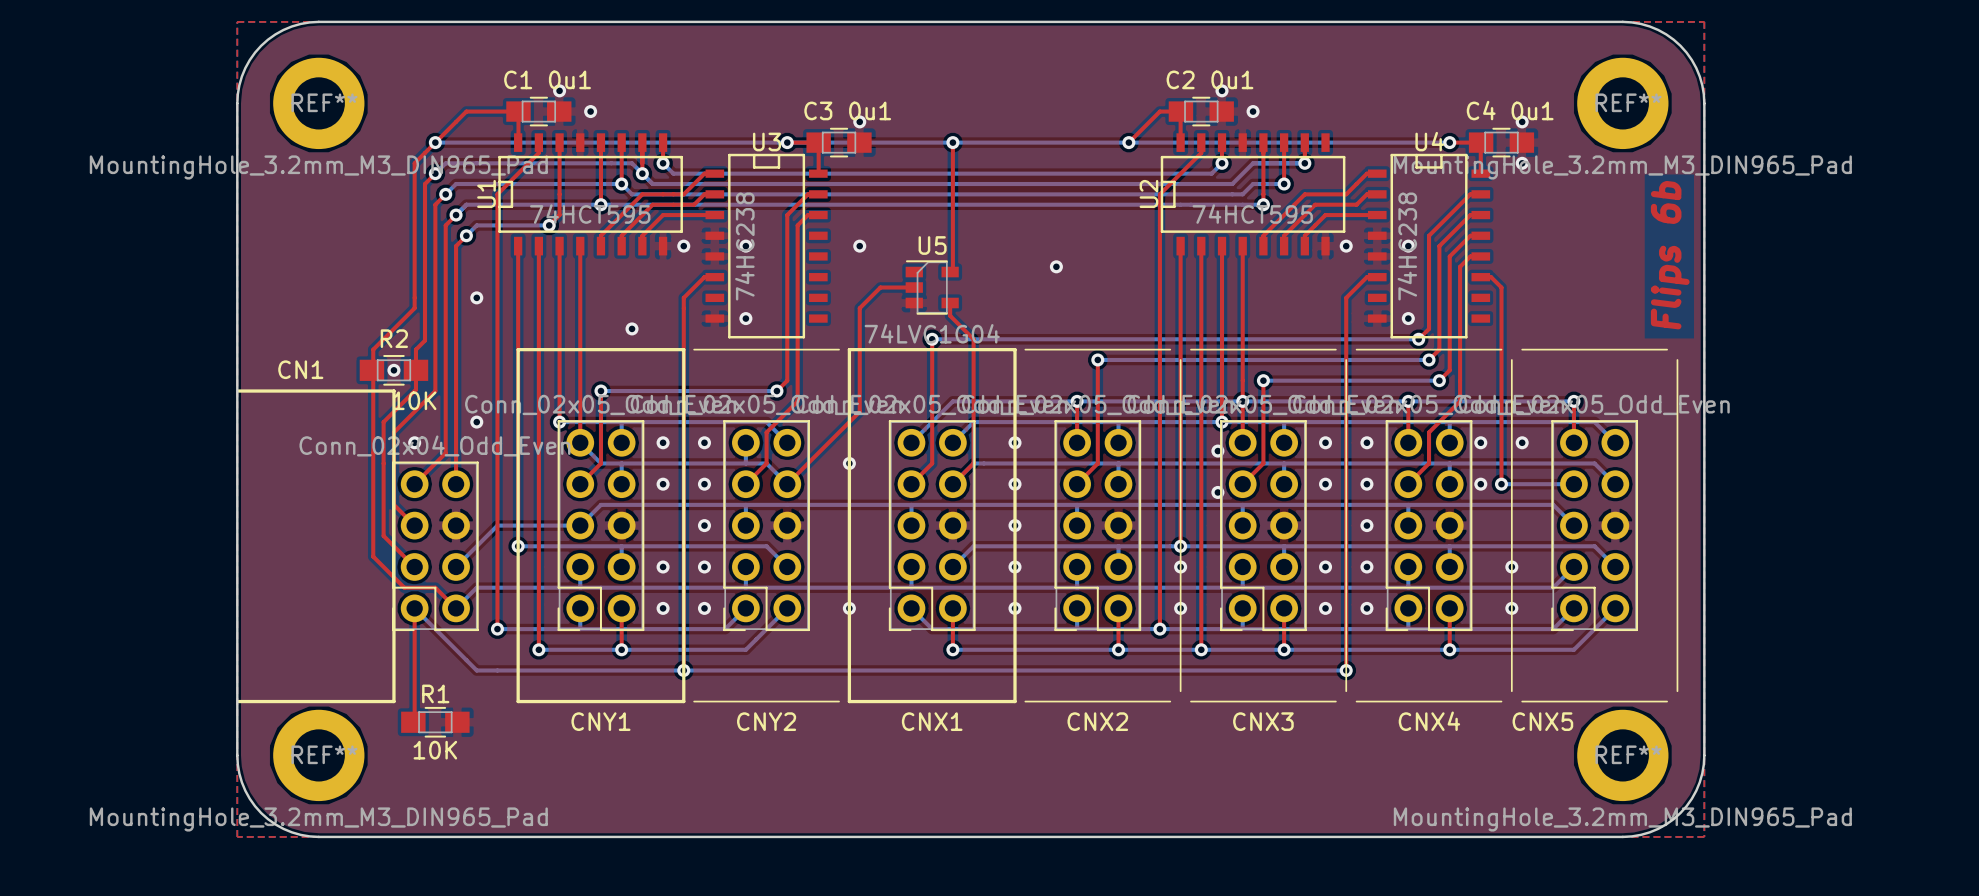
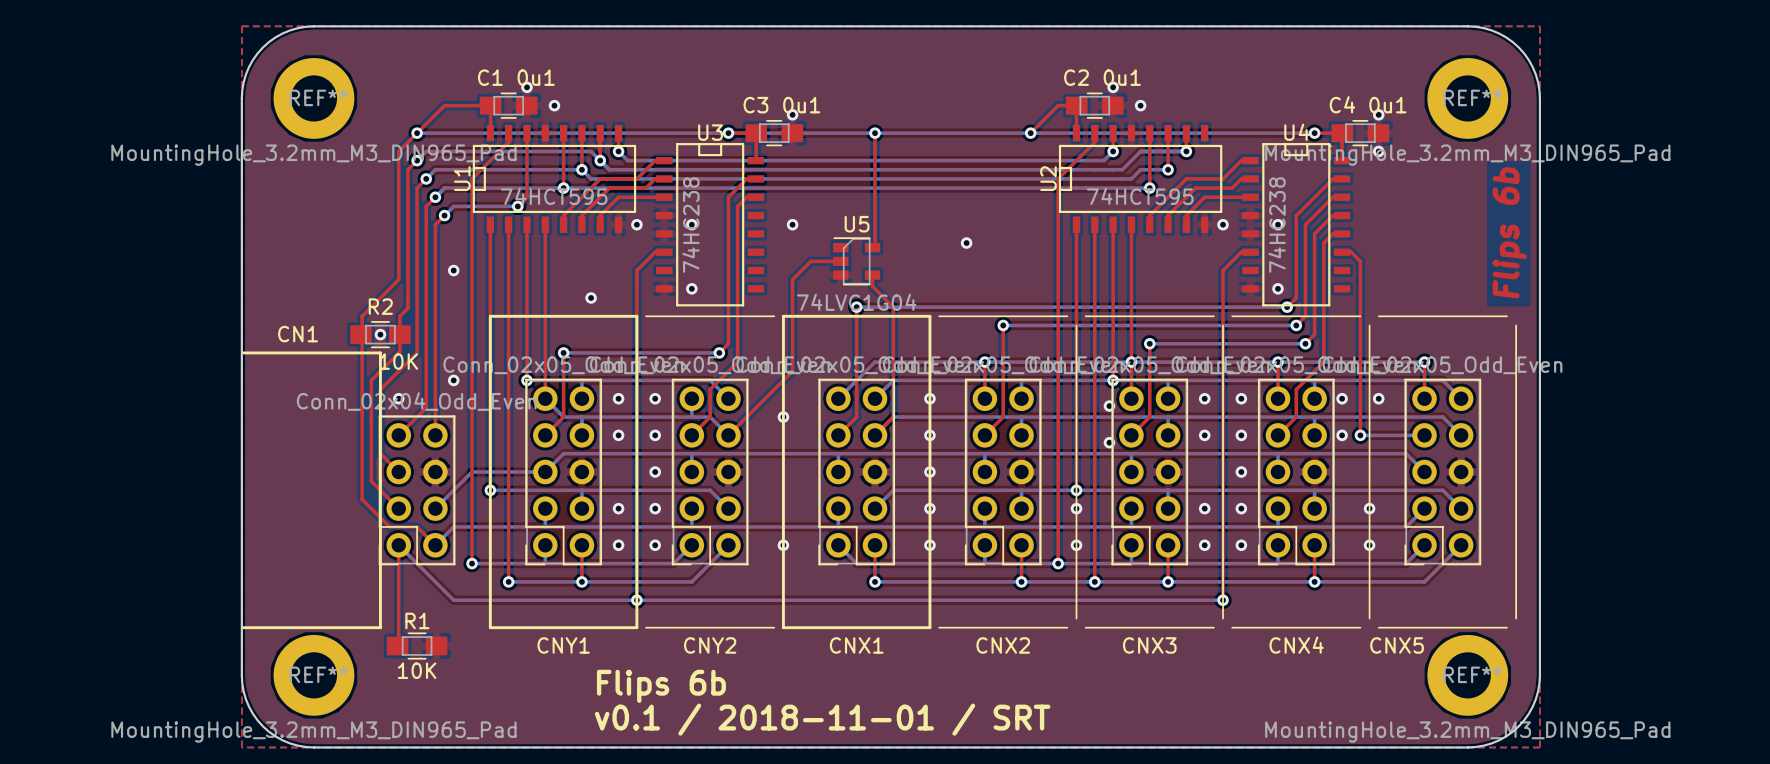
text: none -> Flips 6b (661, 686)
text: none -> v0.1 / 2018-11-01 / SRT (822, 719)

